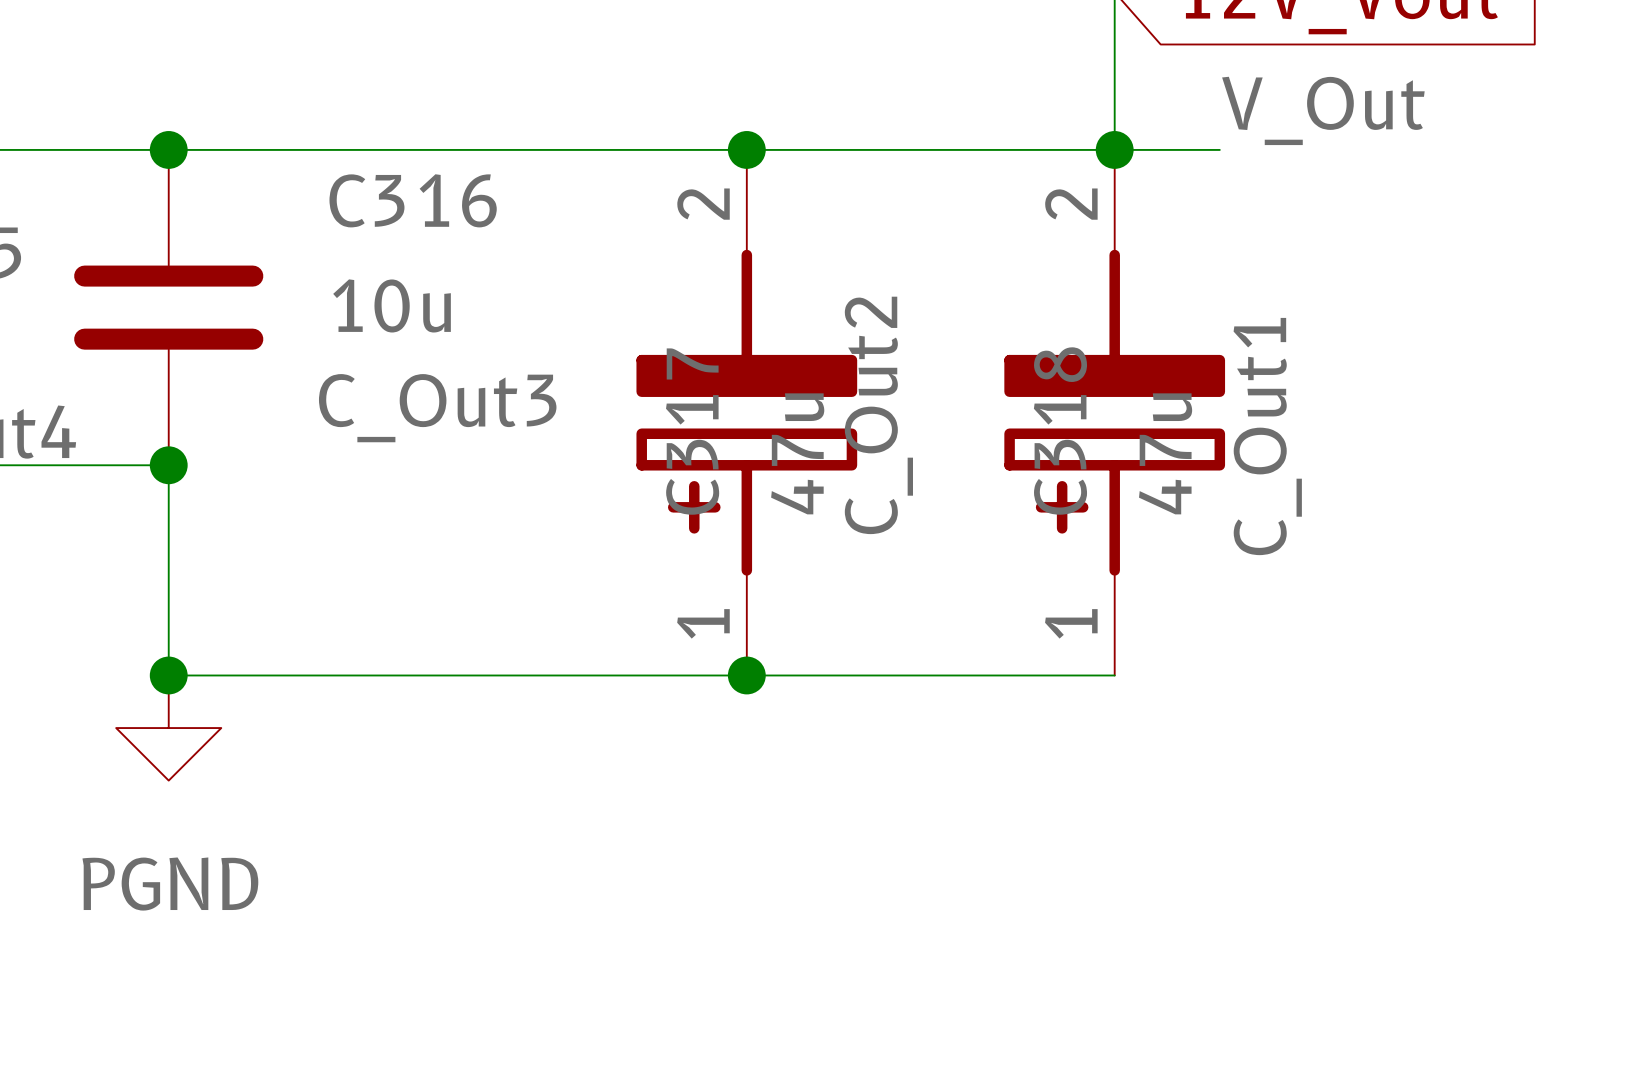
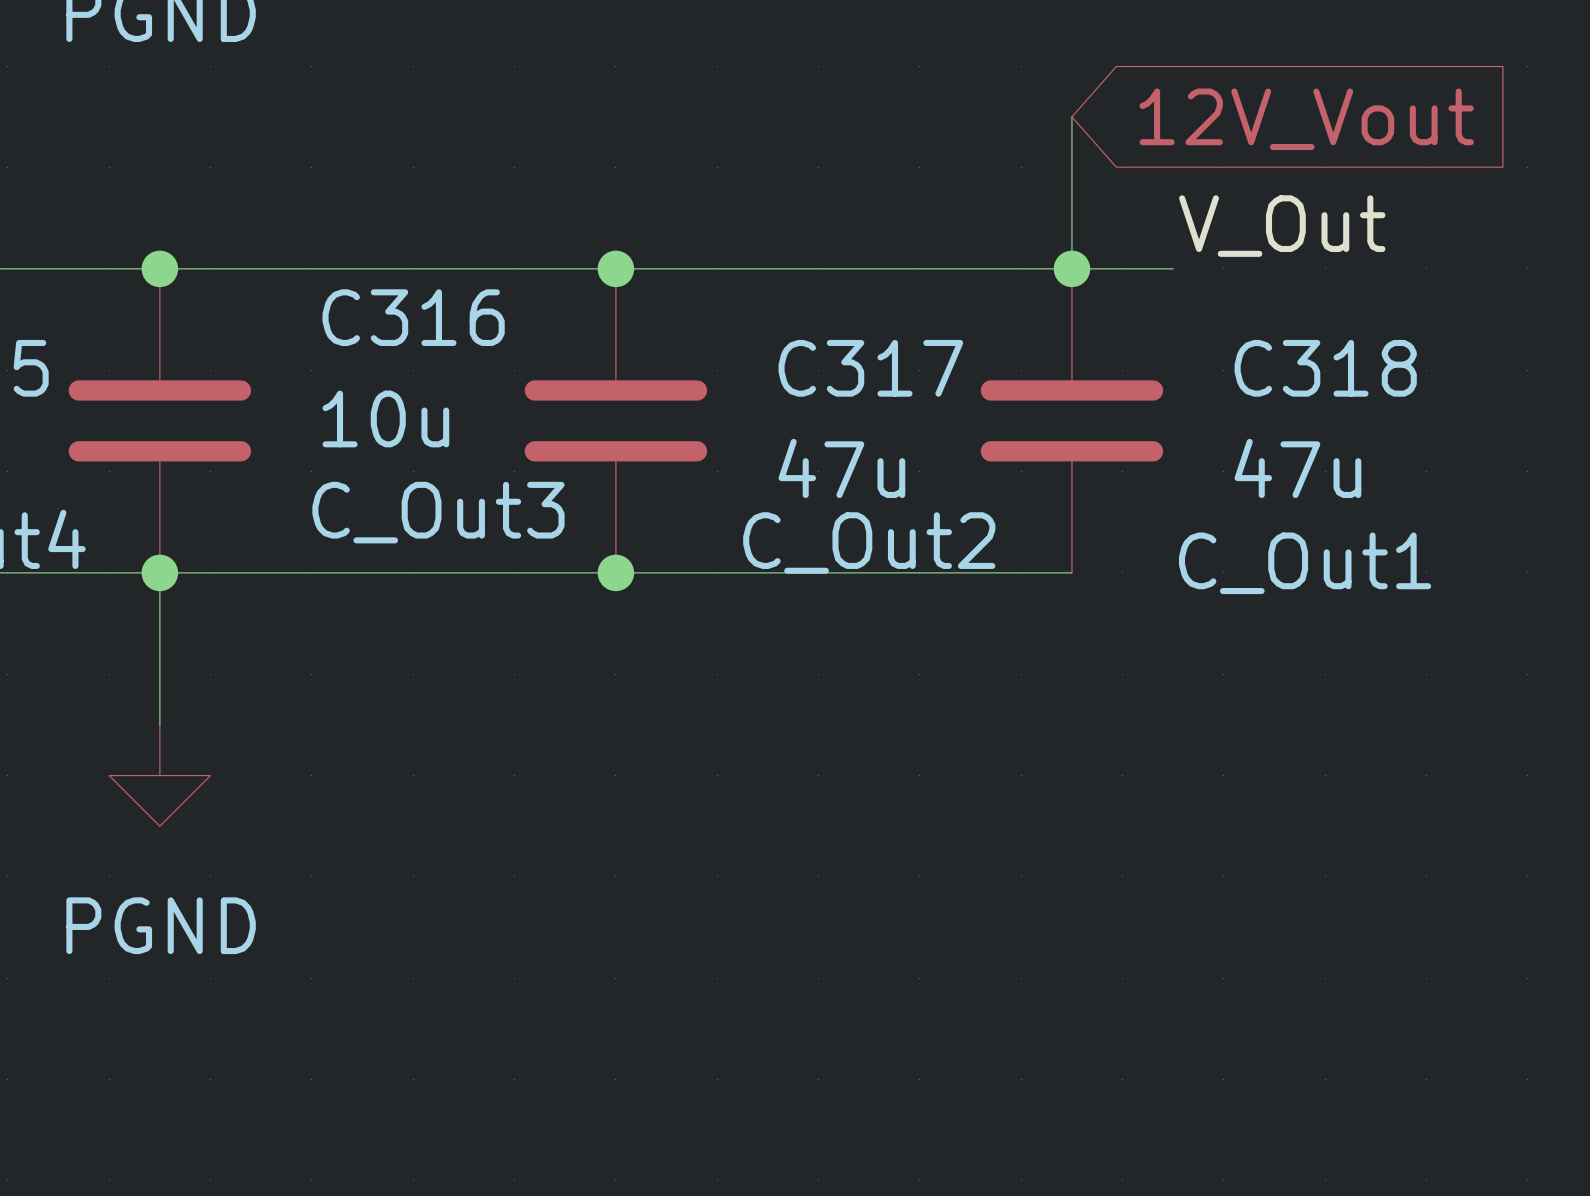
C317 symbol: [636, 149, 858, 676] -> [524, 268, 708, 573]
junction position: (746, 149) -> (615, 268)
C318 symbol: [1004, 149, 1226, 676] -> [980, 268, 1164, 573]
C317 text position: C_Out2 (878, 415) -> C_Out2 (869, 543)
C317 name position: C317 (692, 431) -> C317 (870, 368)
C318 name position: C318 (1060, 431) -> C318 (1325, 368)
C318 text position: C_Out1 (1267, 436) -> C_Out1 (1305, 563)
C317 value position: 47u (797, 453) -> 47u (841, 468)
C318 value position: 47u (1165, 453) -> 47u (1297, 468)
wire: none -> (159, 572) (1071, 572)
junction: none -> (615, 572)
wire: (168, 622) (168, 675) (1114, 675) -> none
junction: (168, 675) -> none
junction: (746, 675) -> none
power symbol position: PGND (168, 728) -> PGND (159, 775)

